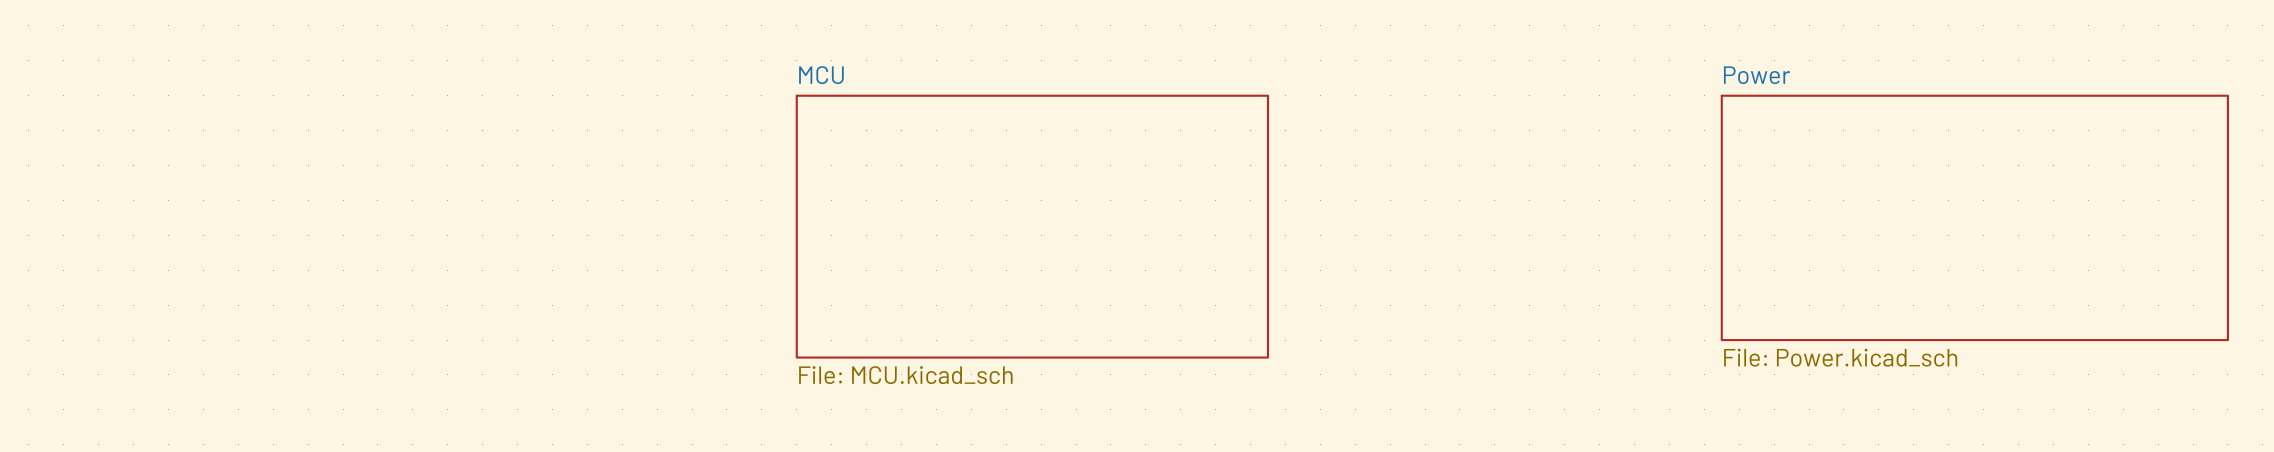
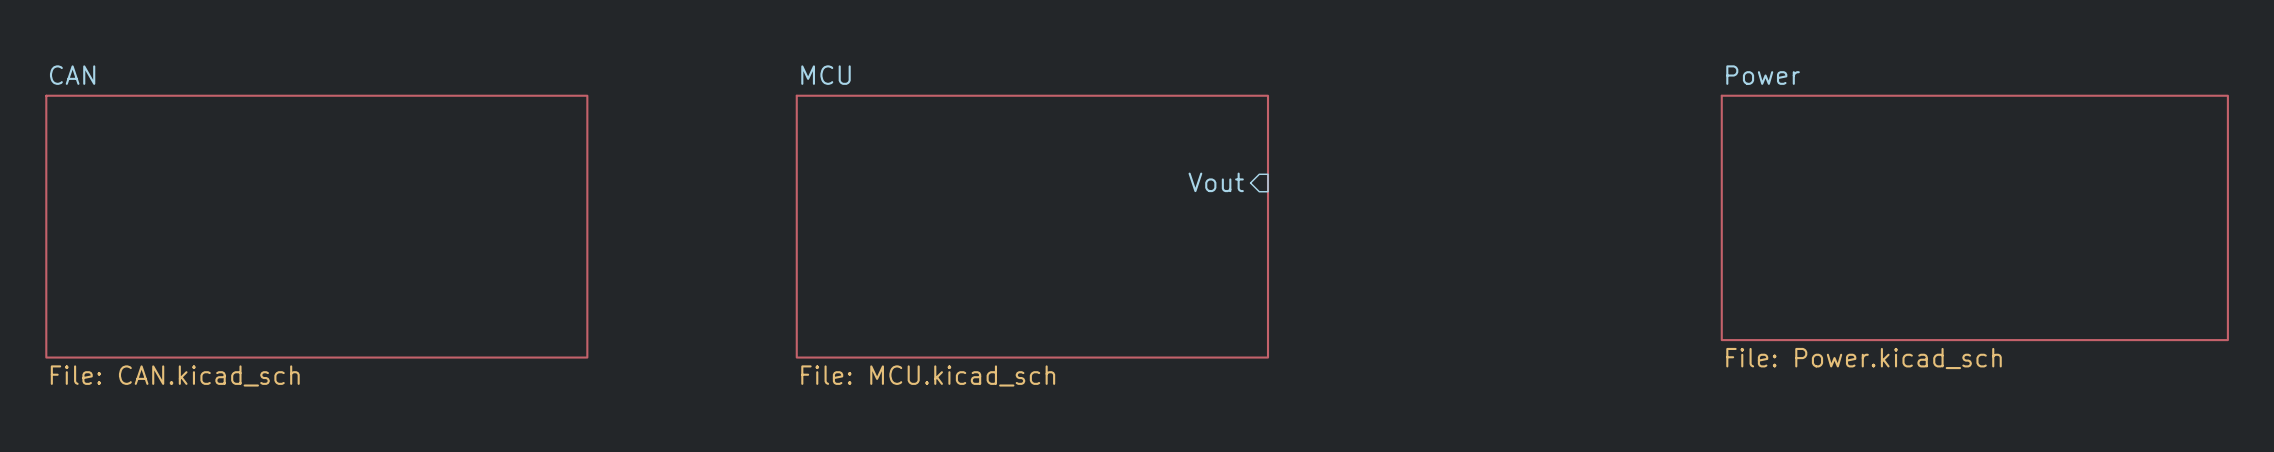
sheet pin: none -> Vout (1216, 182)
sheet CAN: none -> File: CAN.kicad_sch (316, 226)

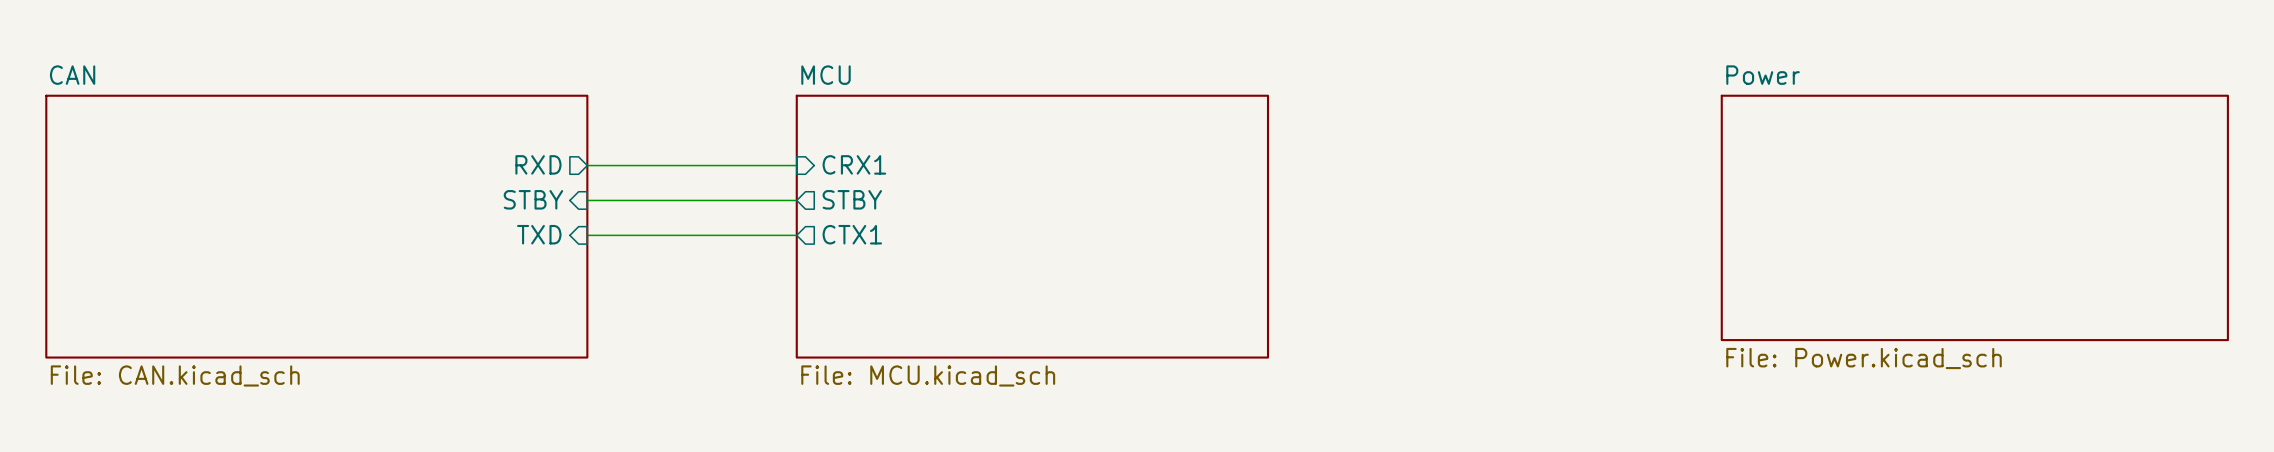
sheet pin: none -> RXD (538, 164)
sheet pin: none -> CRX1 (854, 164)
wire: none -> (587, 165) (796, 165)
sheet pin: Vout (1216, 182) -> none
sheet pin: none -> STBY (533, 199)
sheet pin: none -> STBY (852, 199)
wire: none -> (587, 200) (796, 200)
sheet pin: none -> TXD (539, 234)
sheet pin: none -> CTX1 (852, 234)
wire: none -> (587, 235) (796, 235)

